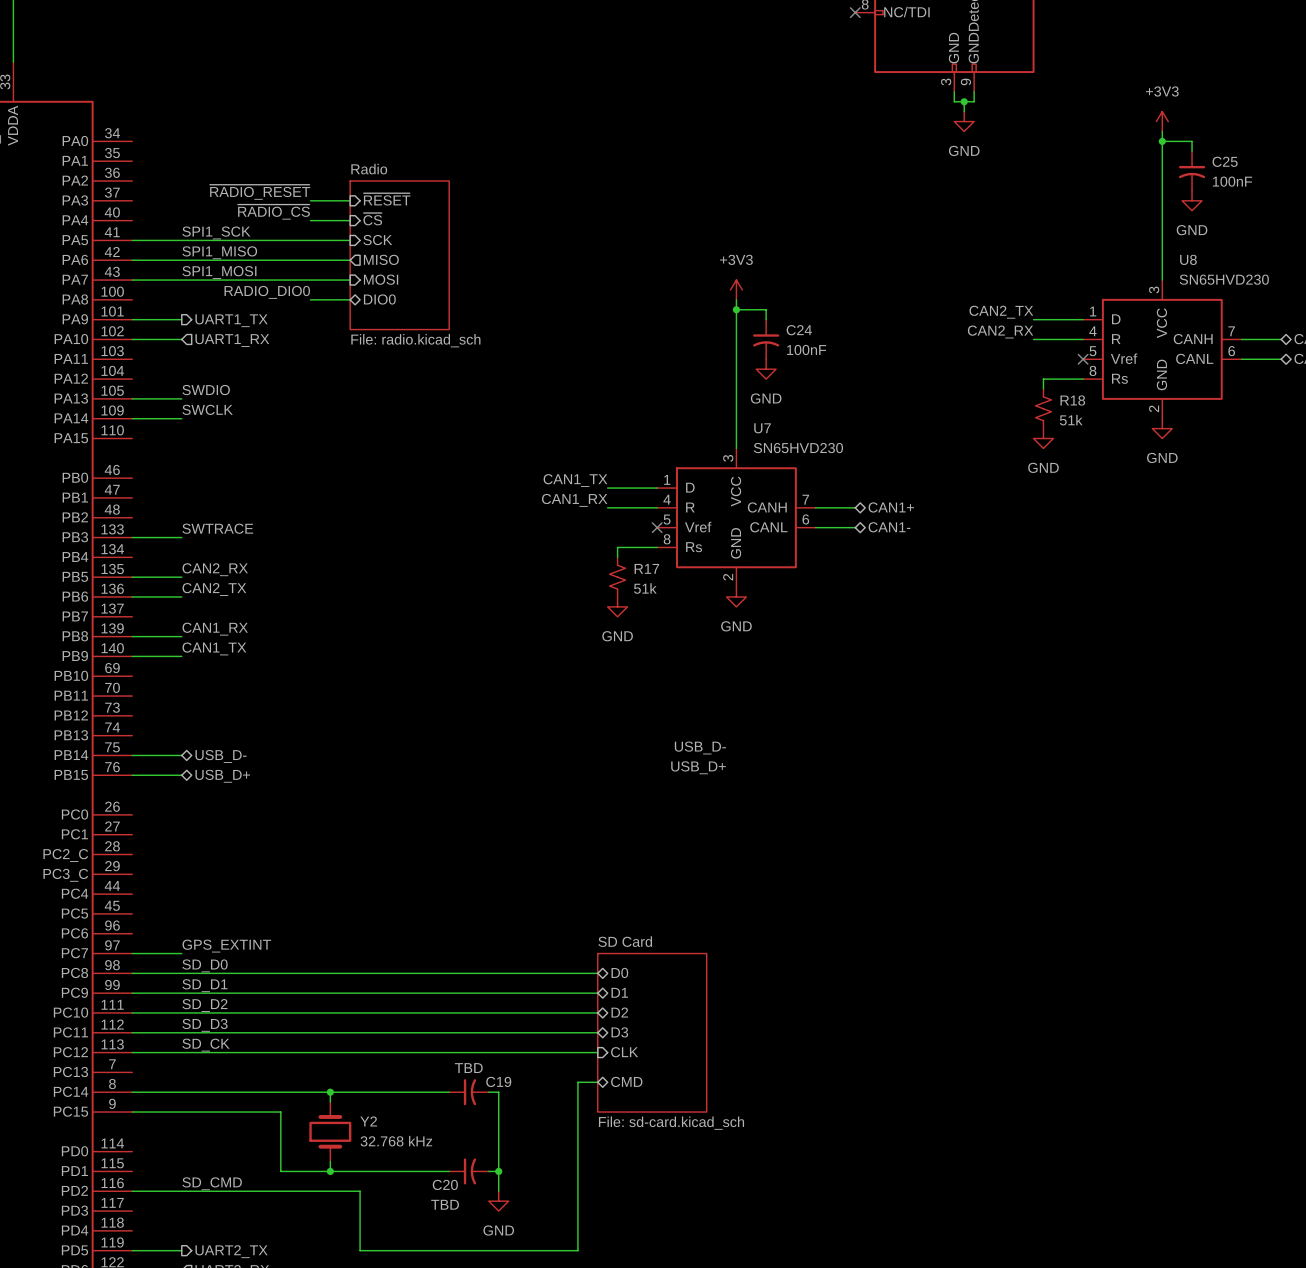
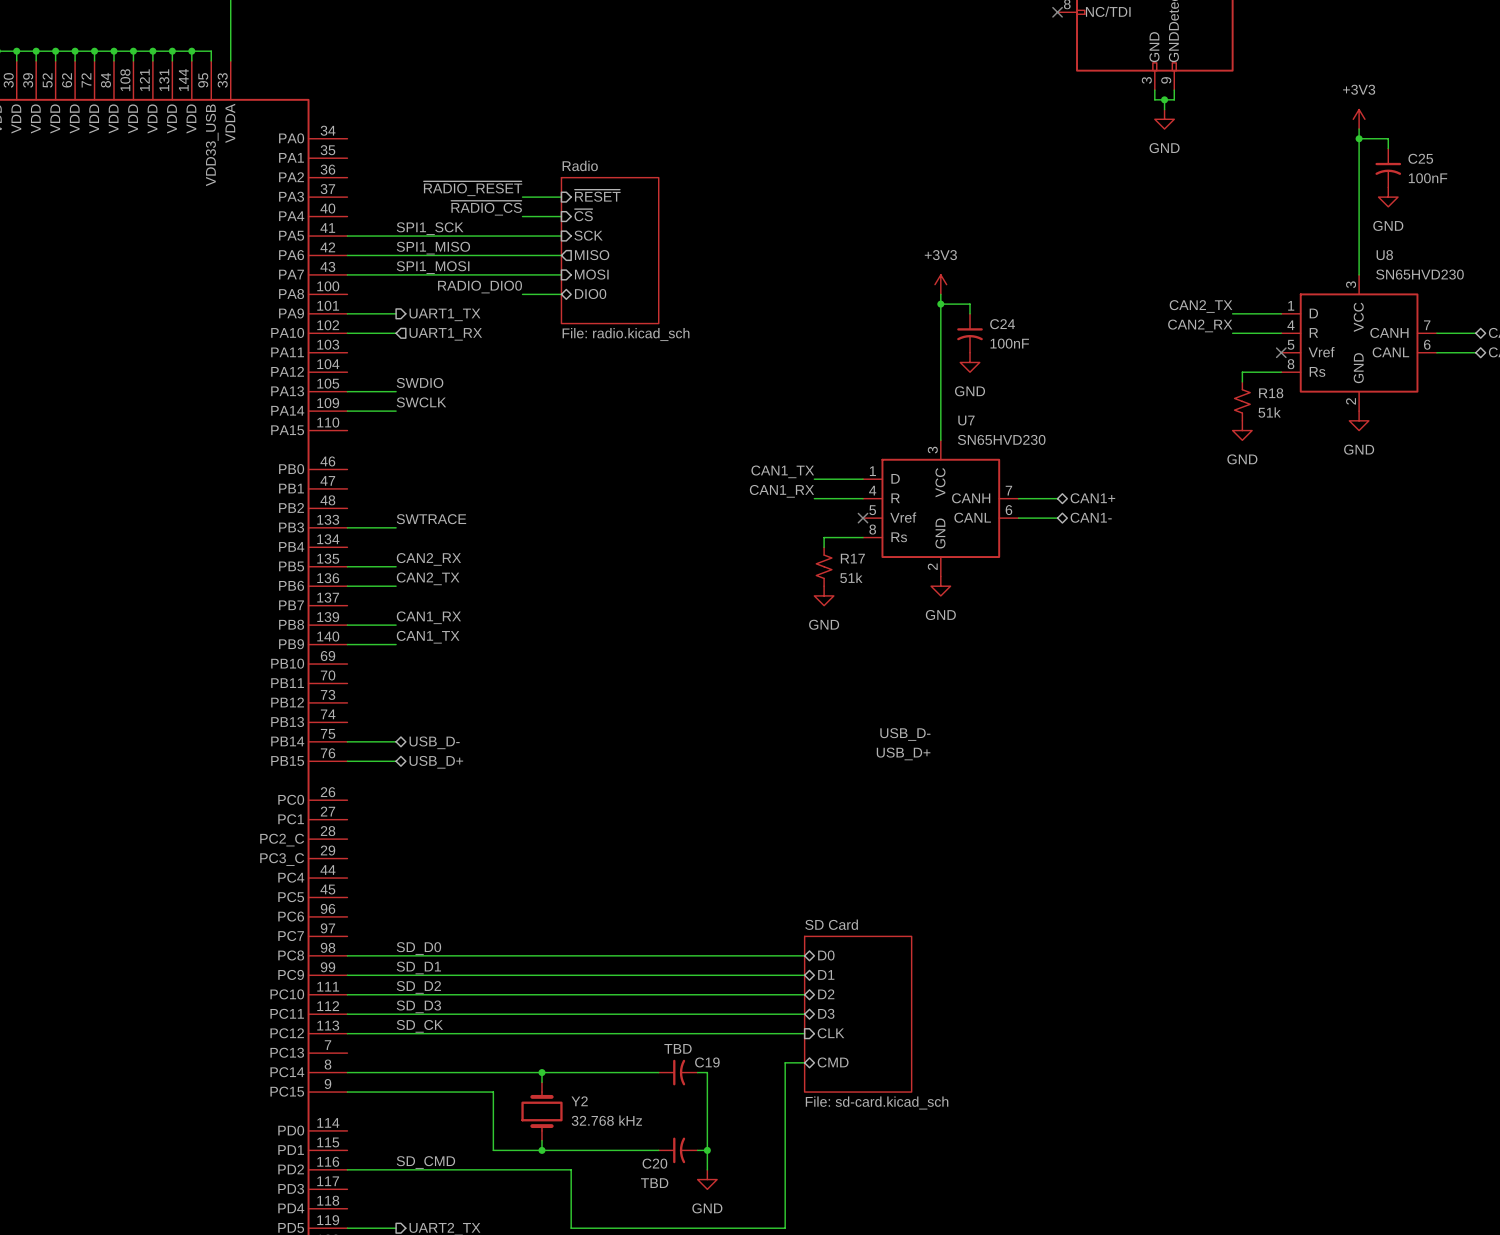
label: GPS_EXTINT (226, 946) -> none
wire: (132, 953) (181, 953) -> none

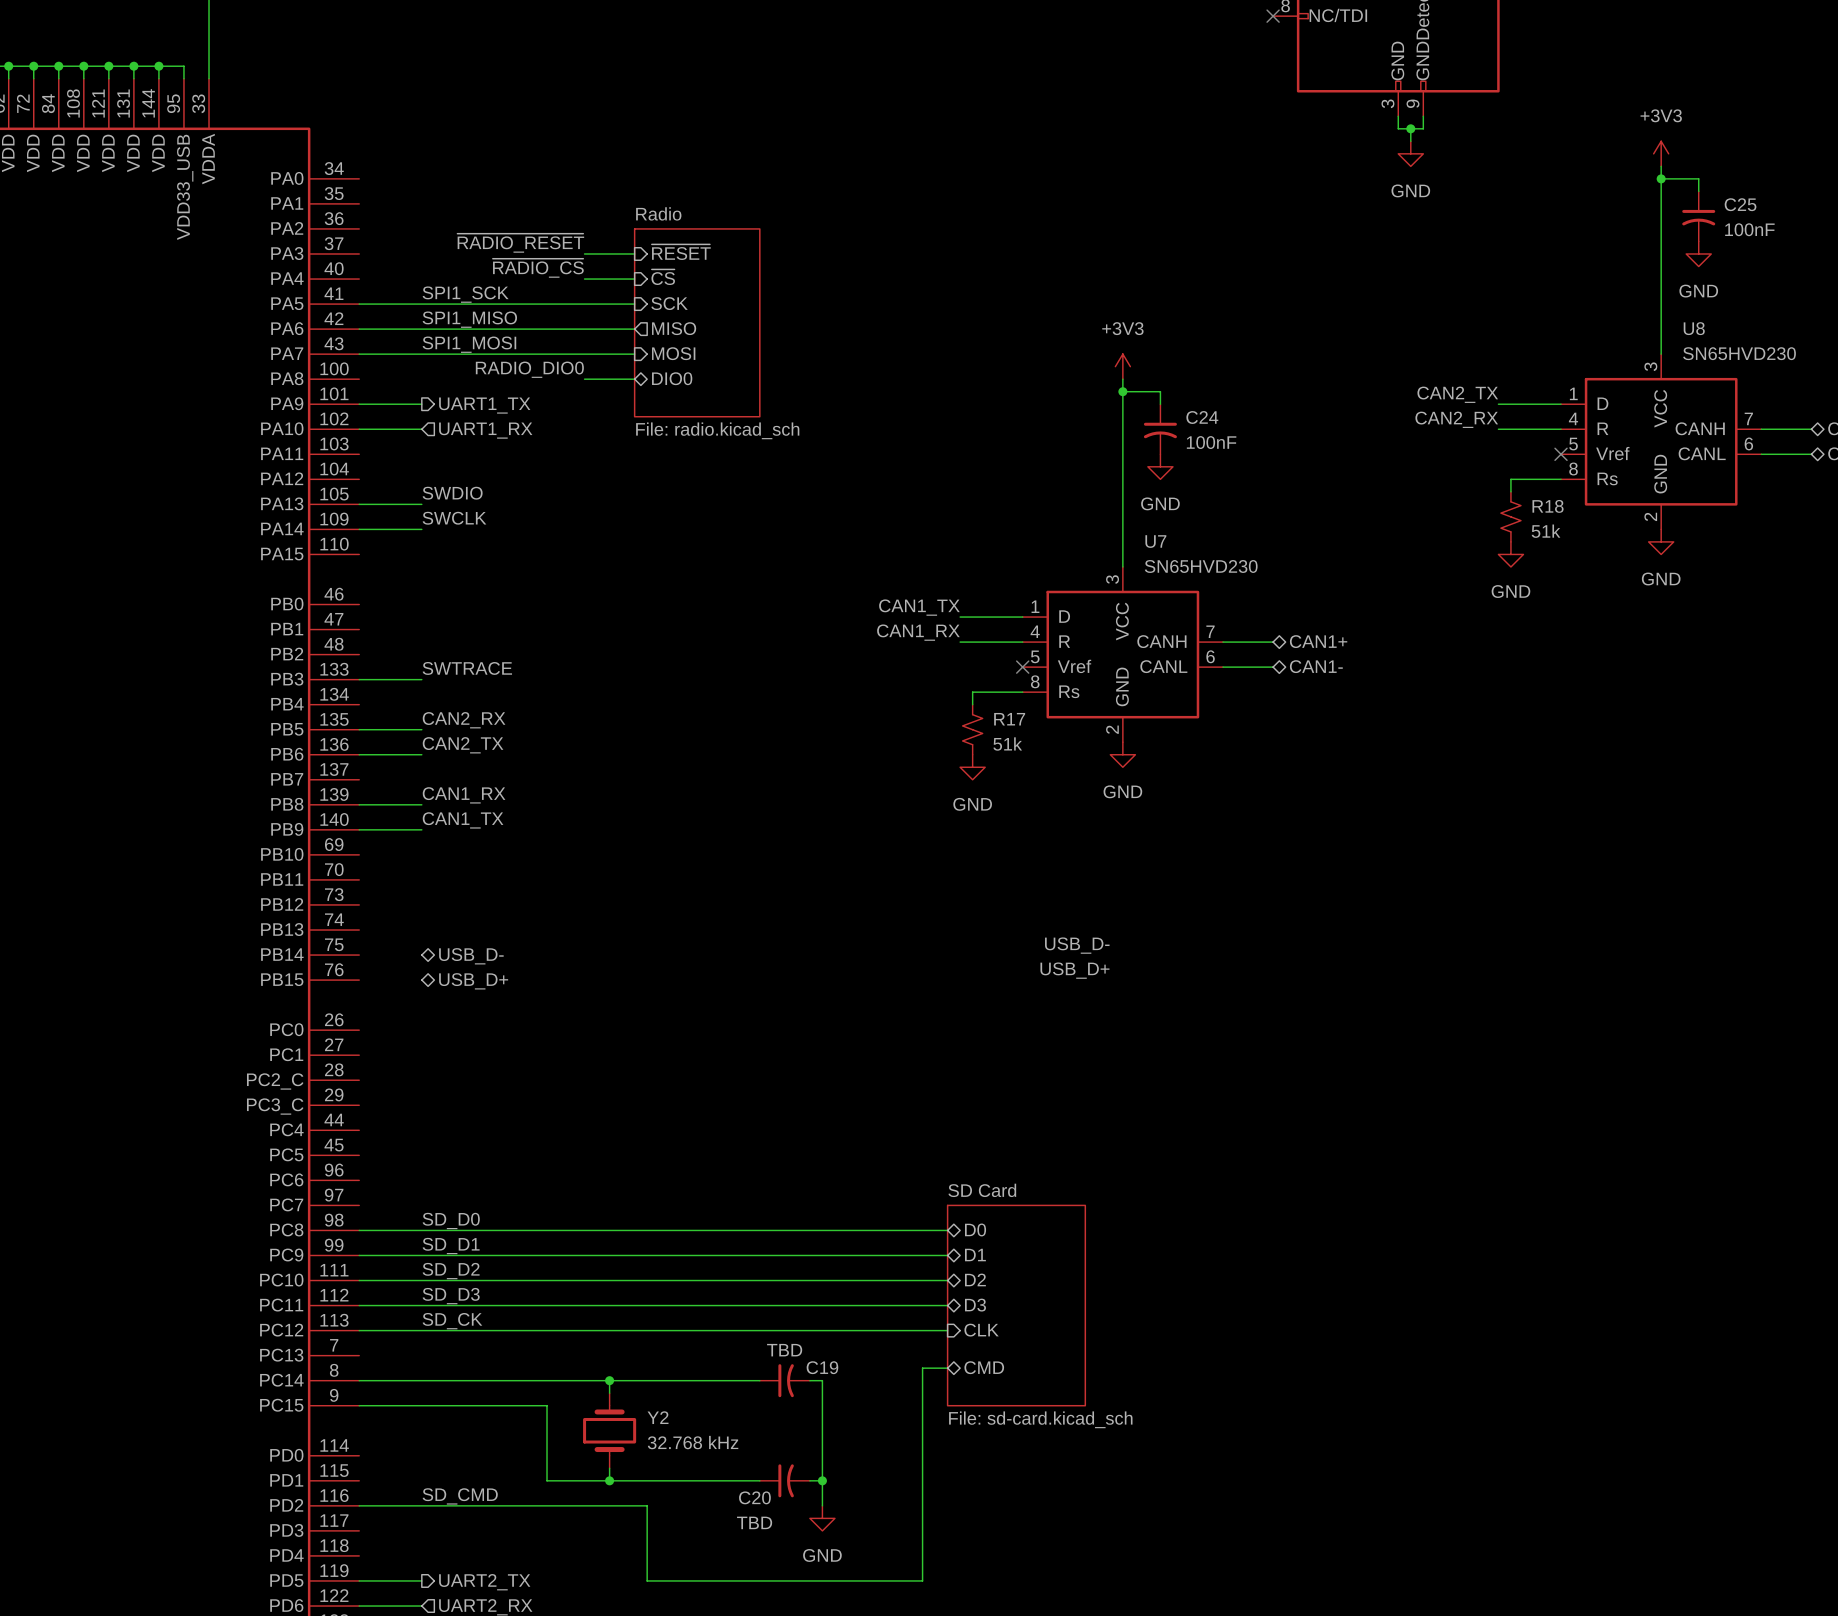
wire: (347, 741) (396, 741) -> none
wire: (347, 761) (396, 761) -> none

